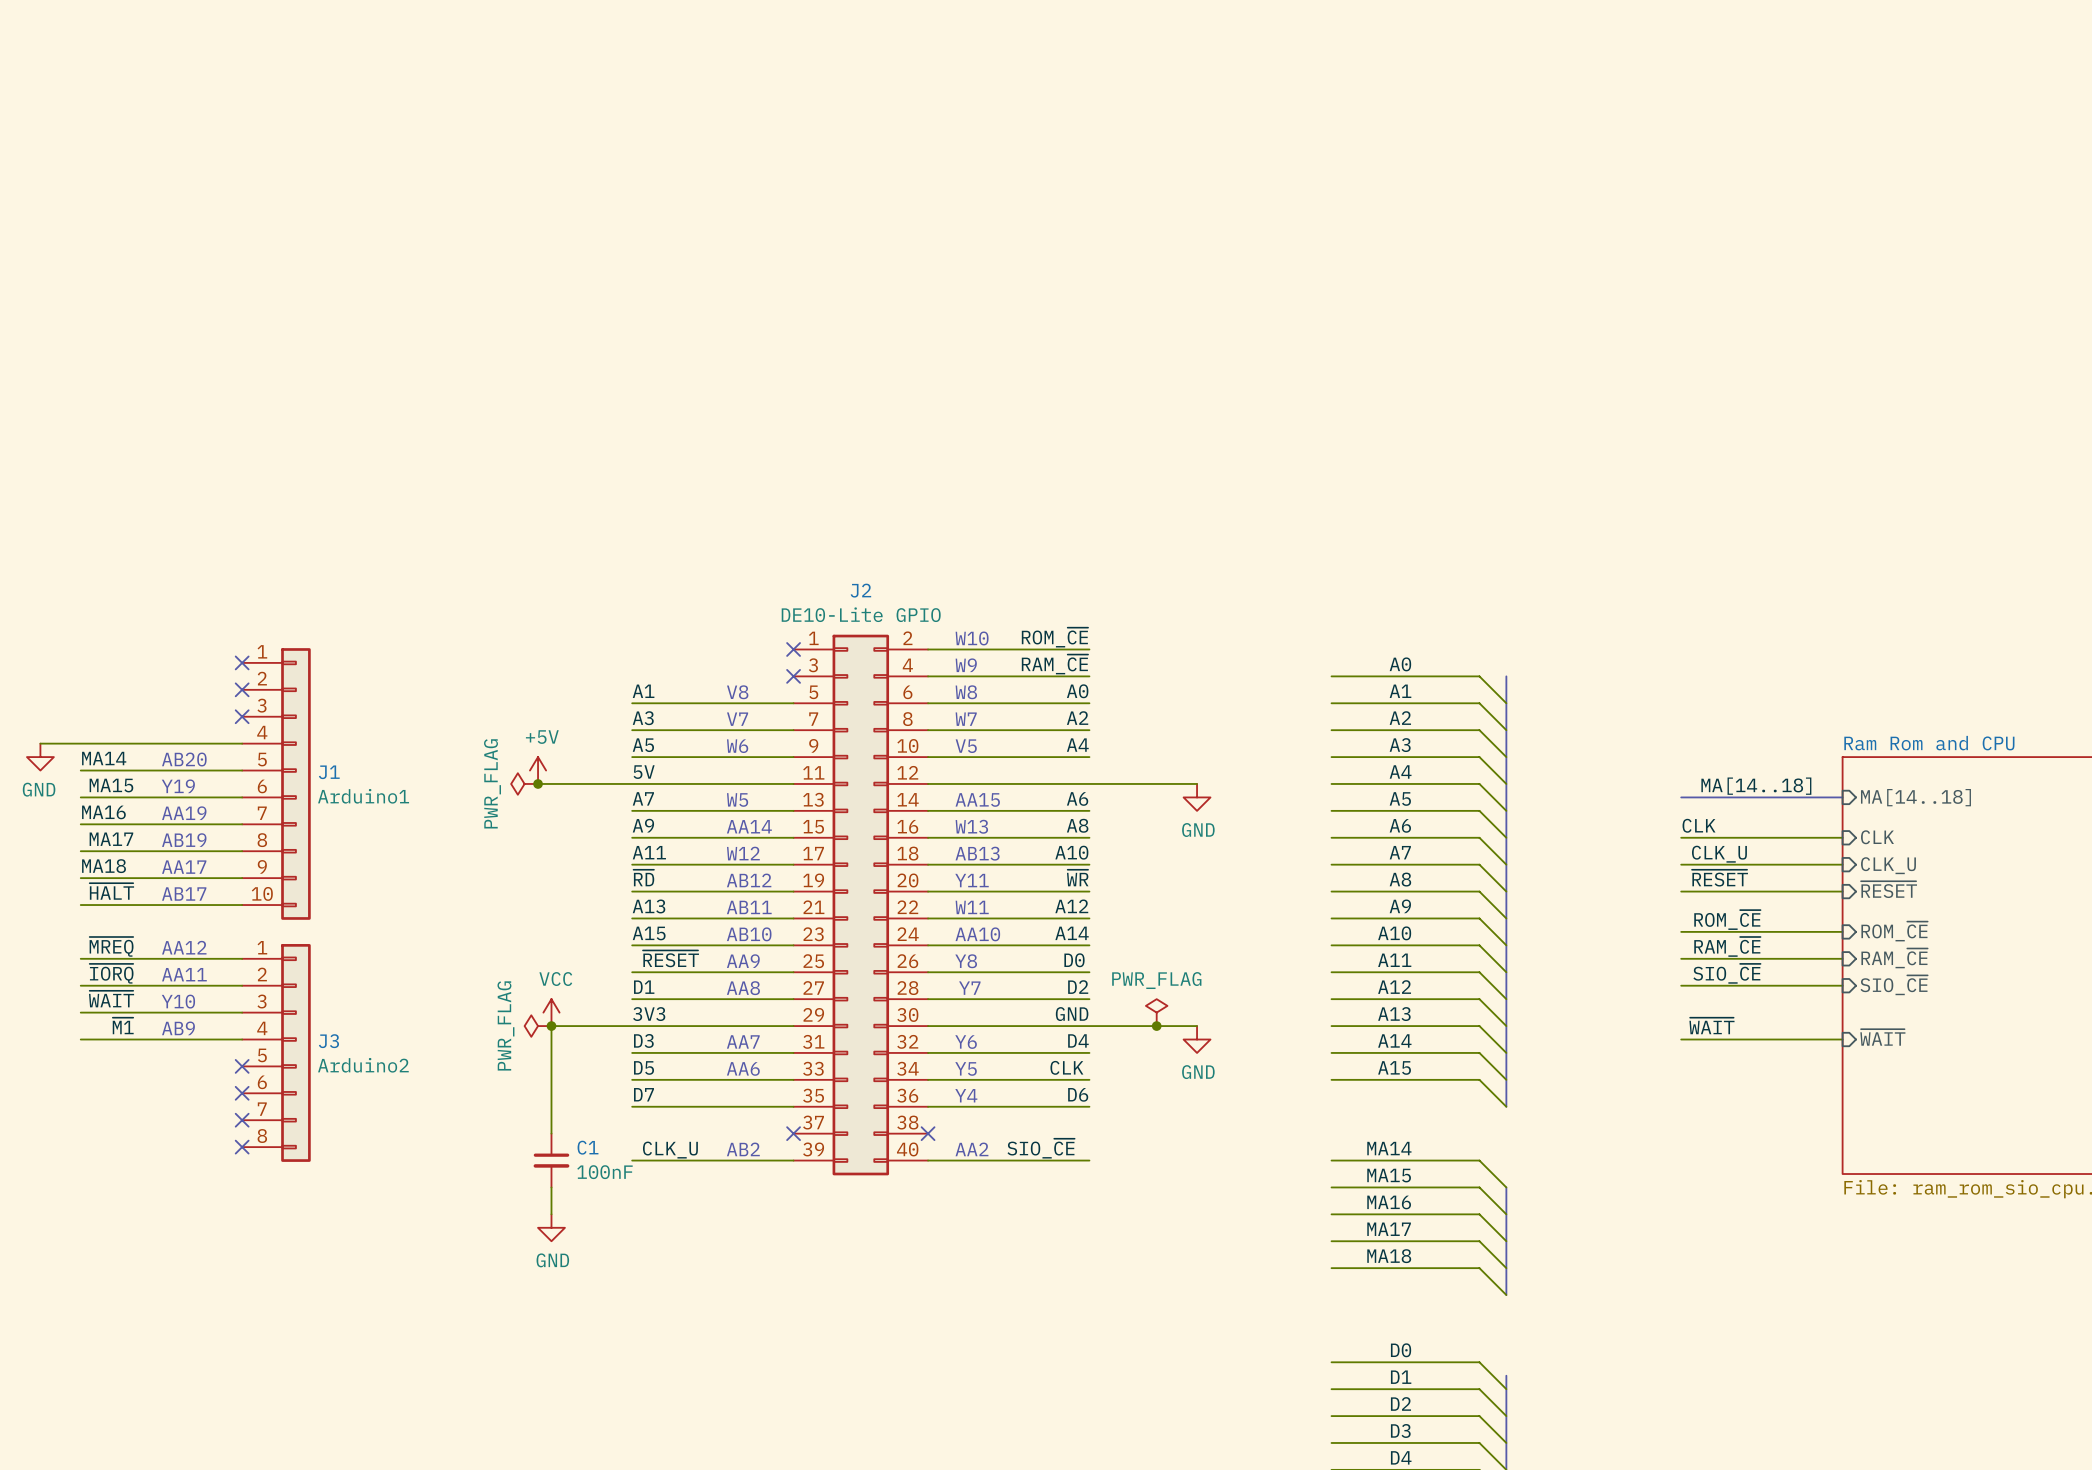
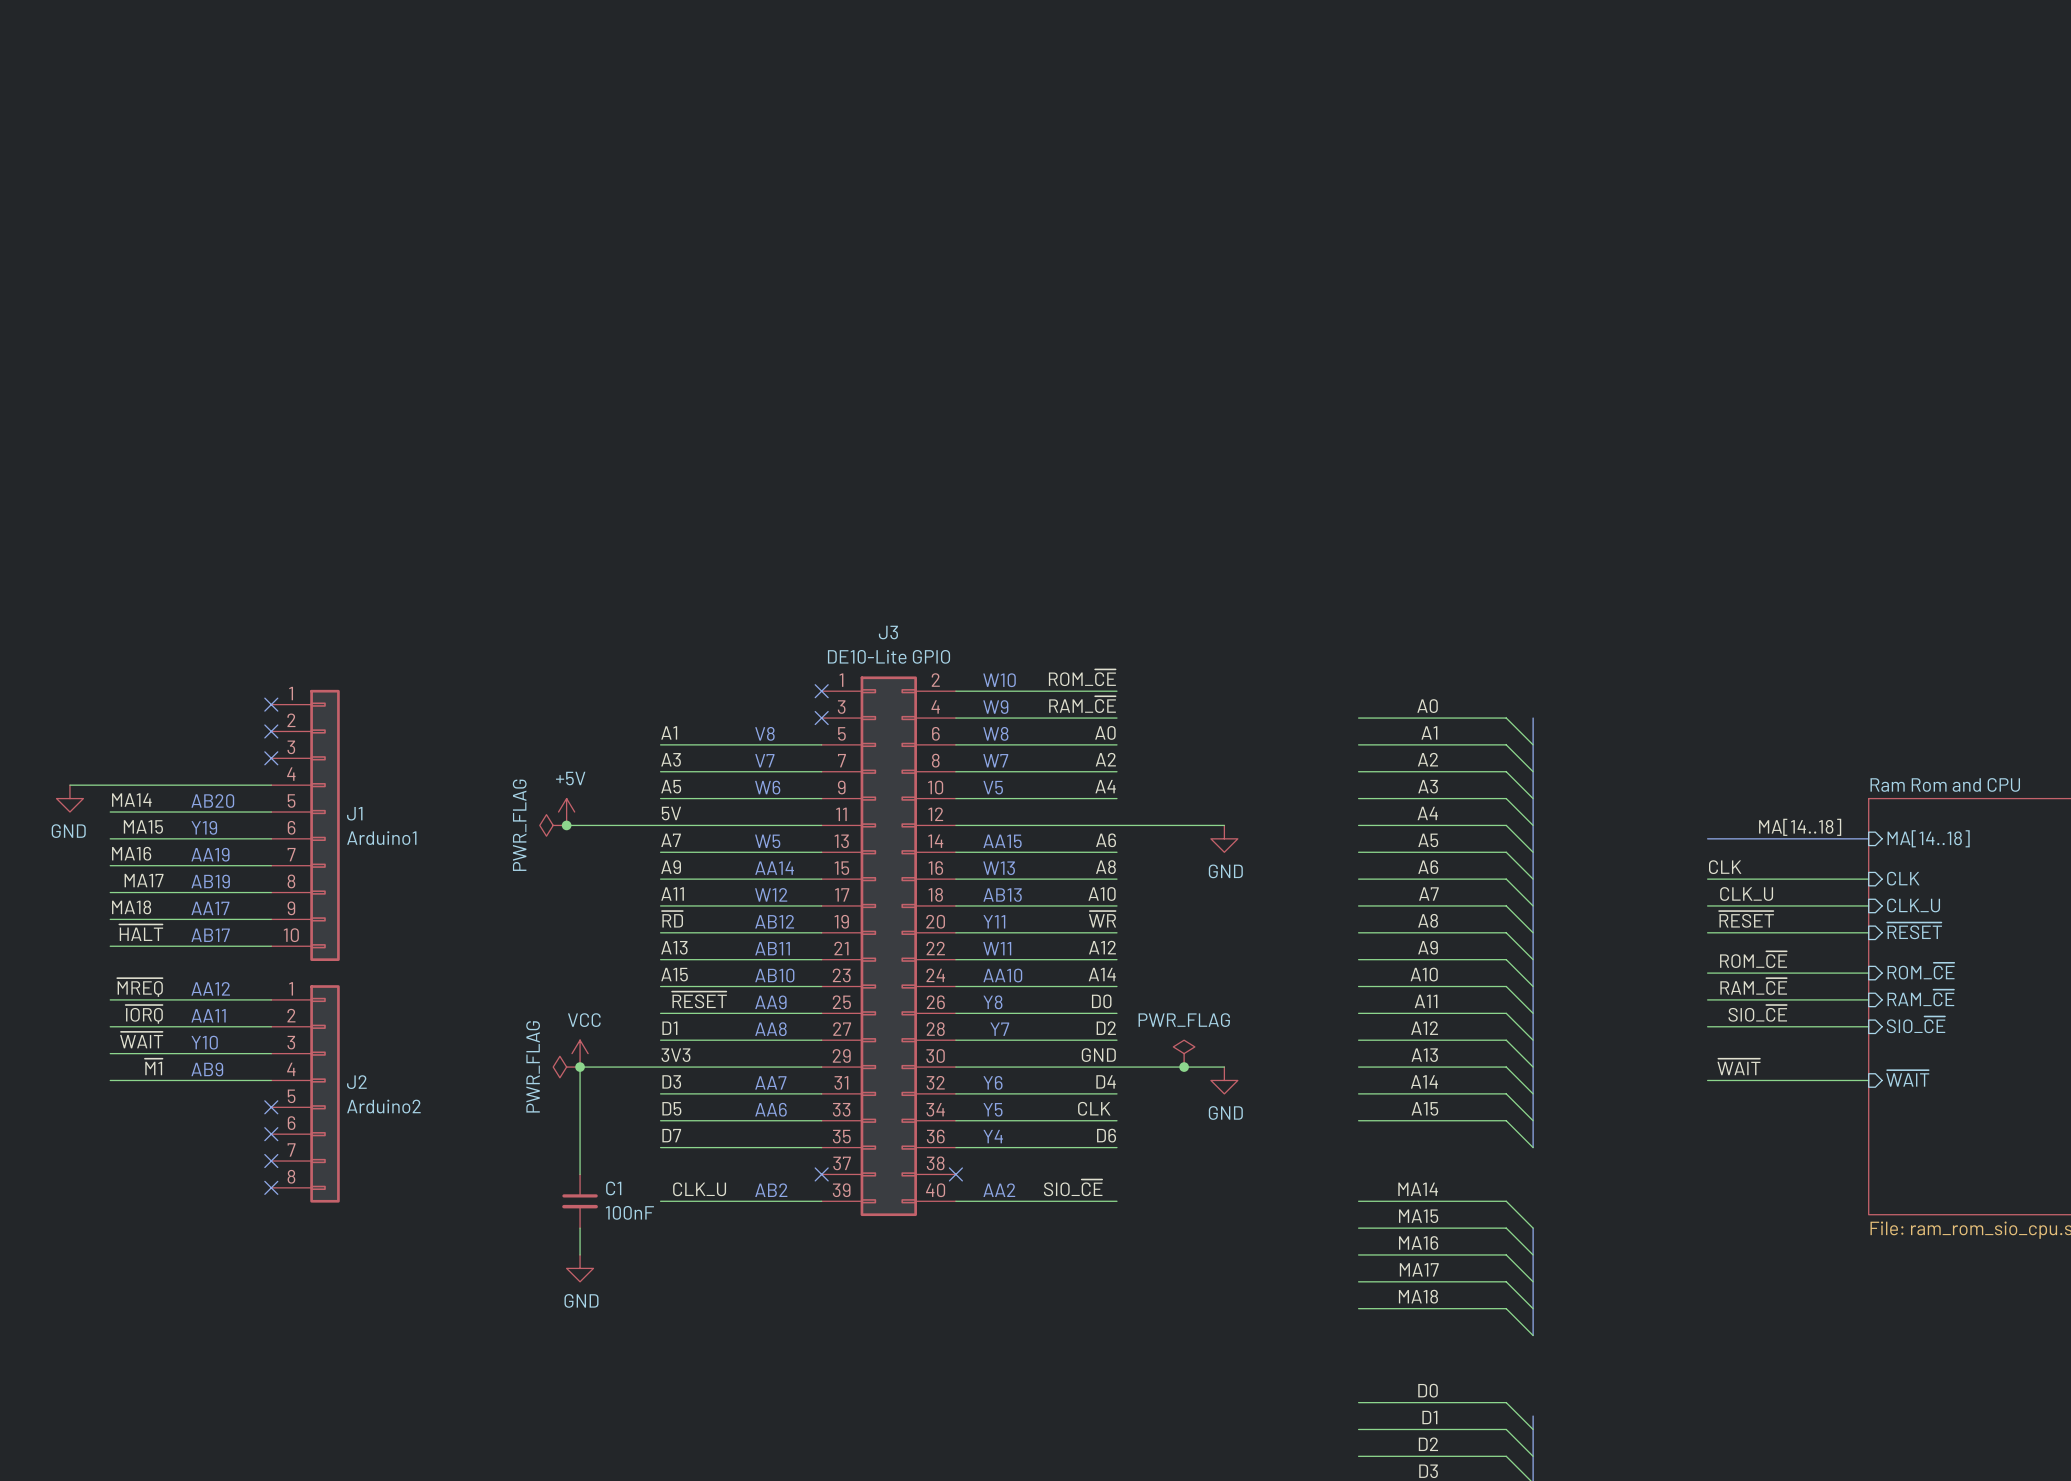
J2 name: J2 (860, 590) -> J3 (888, 632)
J3 name: J3 (328, 1041) -> J2 (356, 1082)

